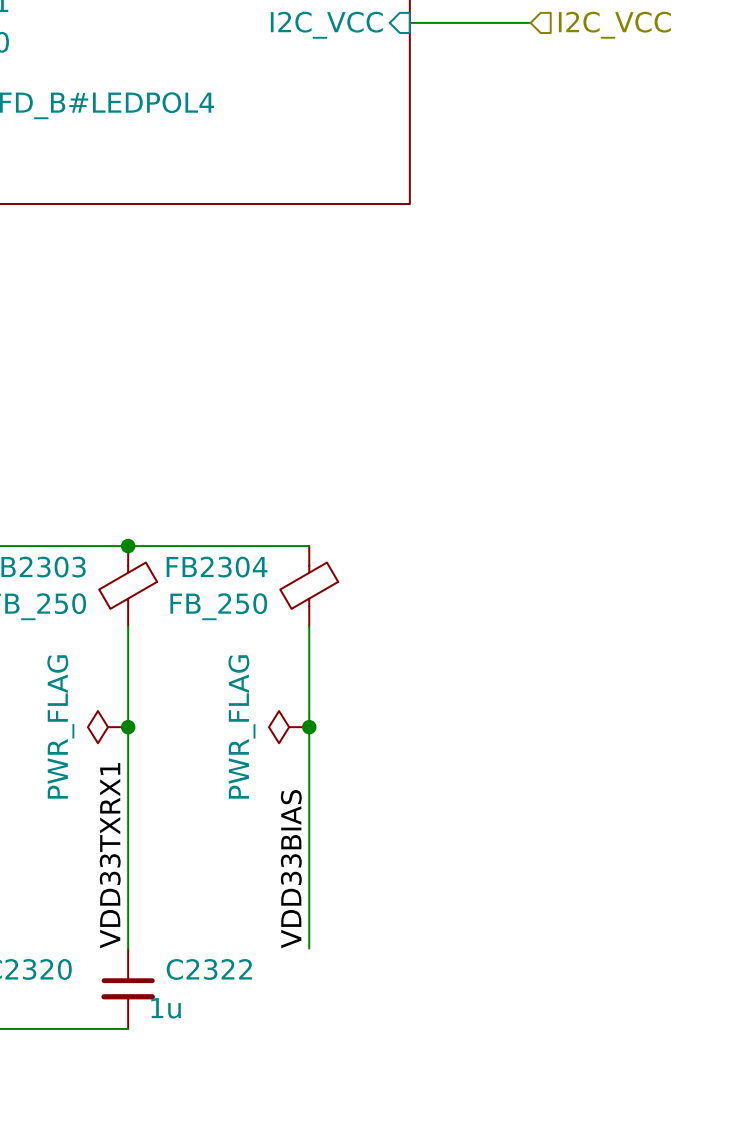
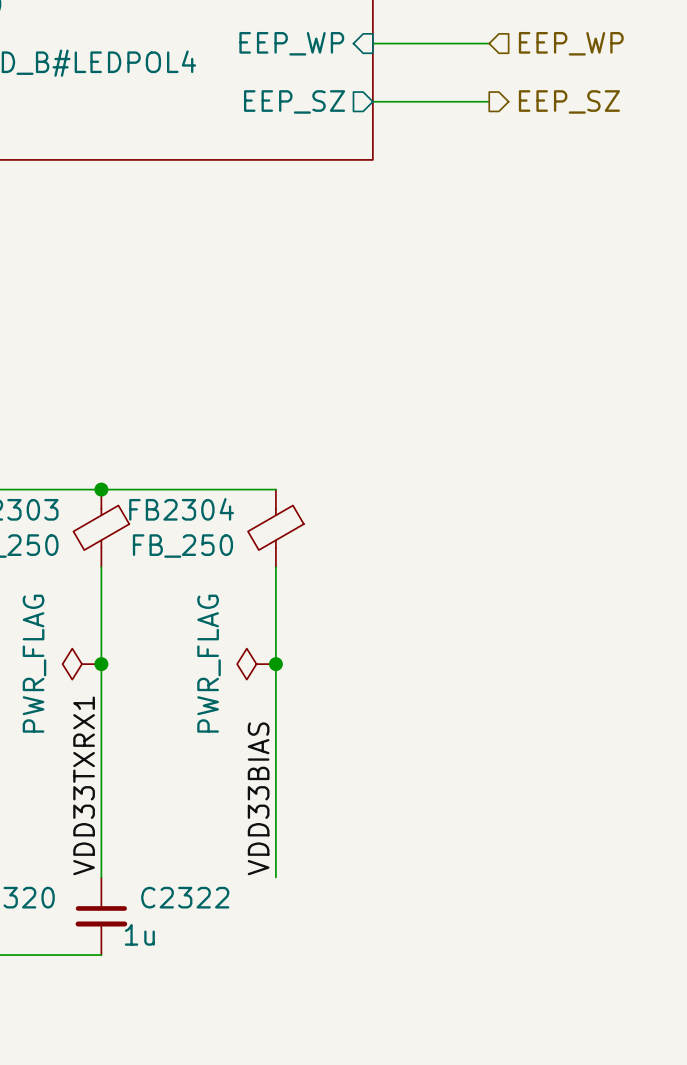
wire: none -> (372, 43) (489, 43)
sheet pin: none -> EEP_WP (291, 43)
hierarchical label: none -> EEP_WP (571, 43)
wire: none -> (372, 101) (489, 101)
sheet pin: none -> EEP_SZ (294, 101)
hierarchical label: none -> EEP_SZ (569, 101)

